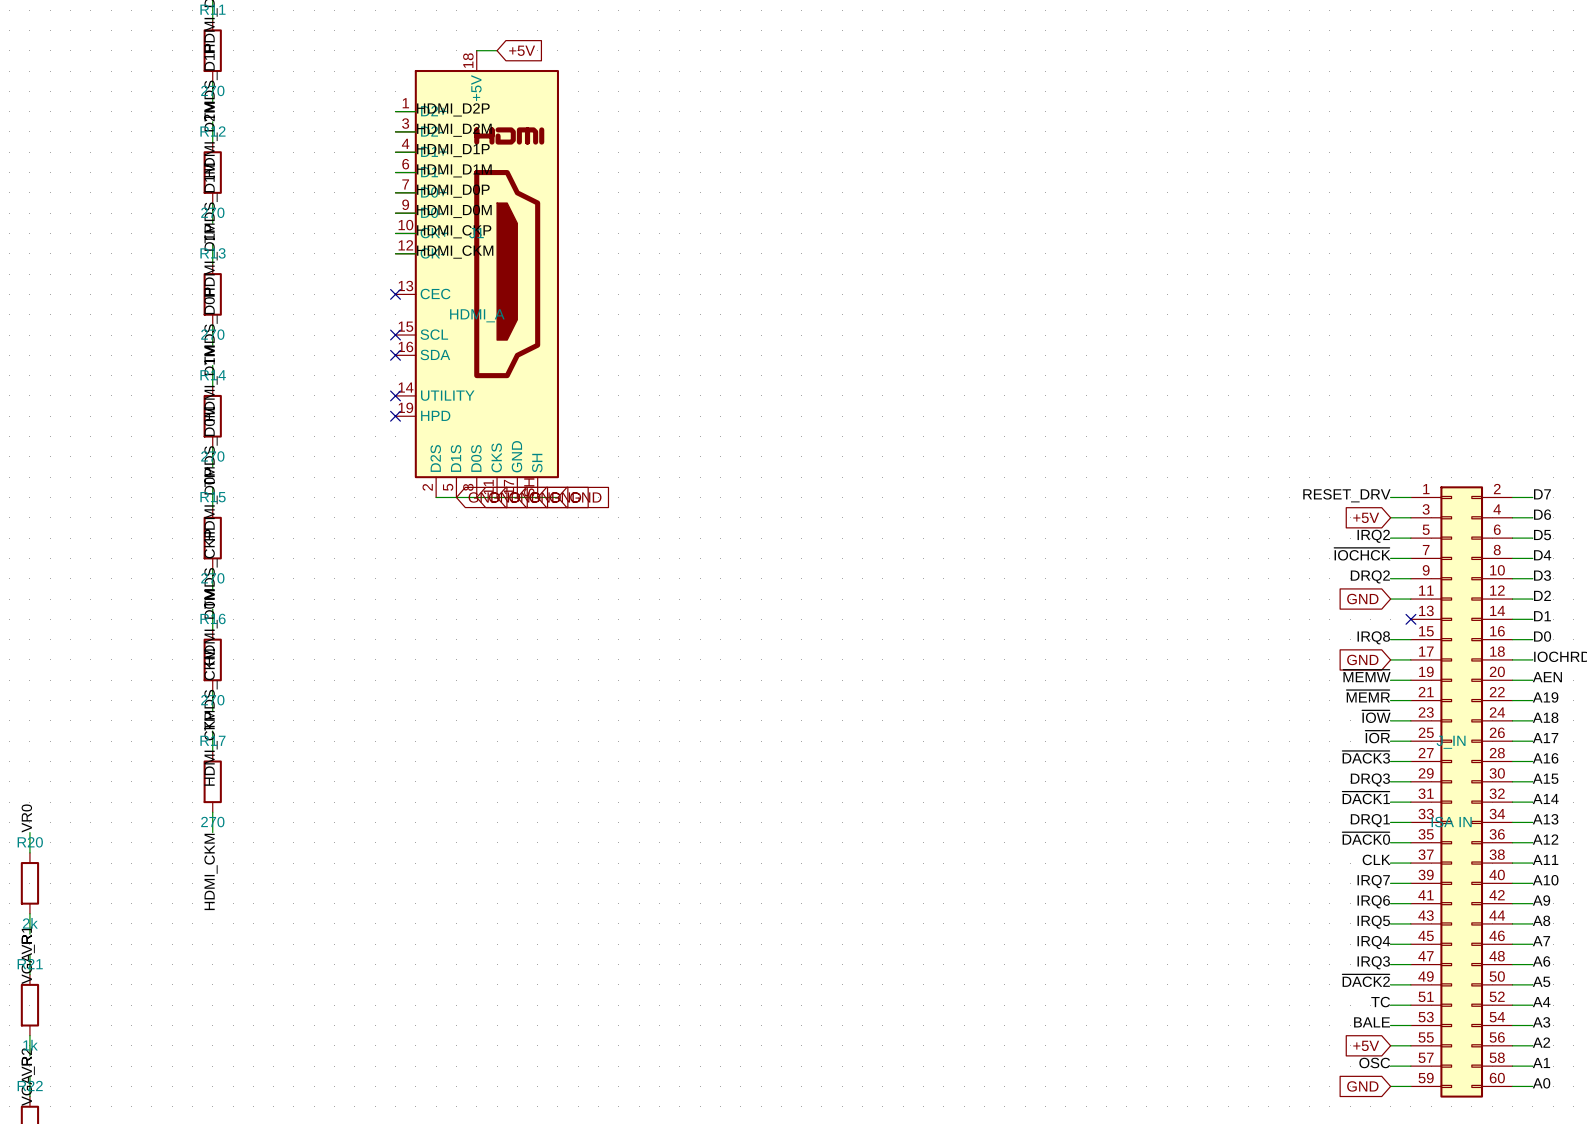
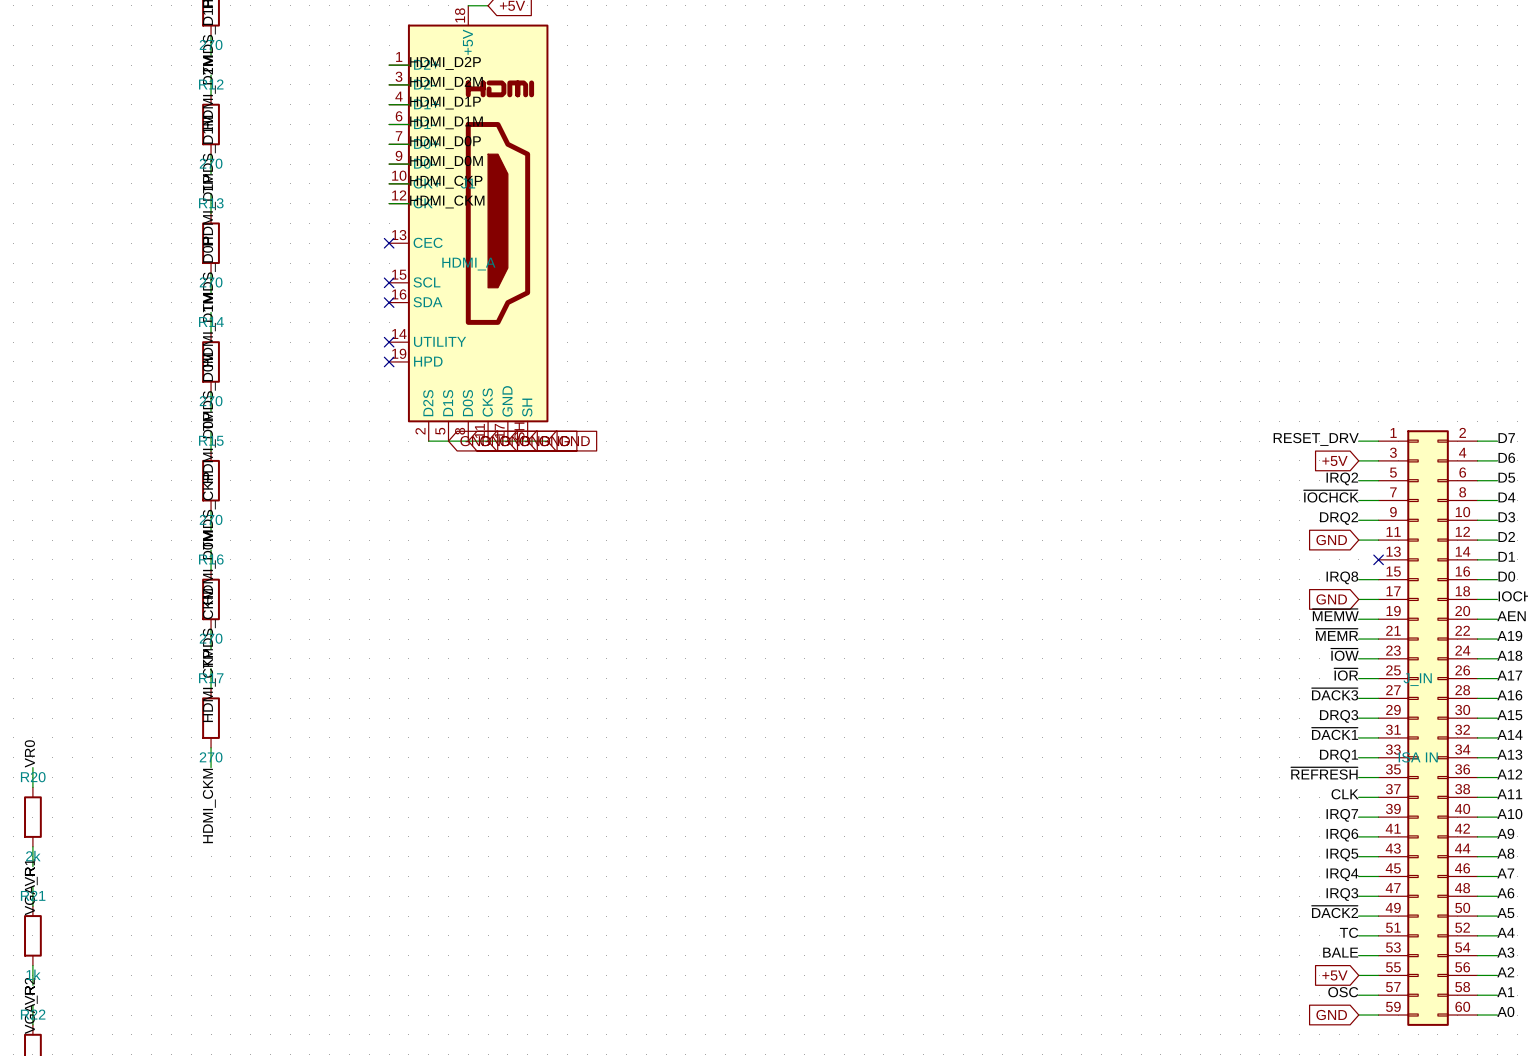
label: ~{DACK0} (1366, 838) -> ~{REFRESH} (1324, 773)

